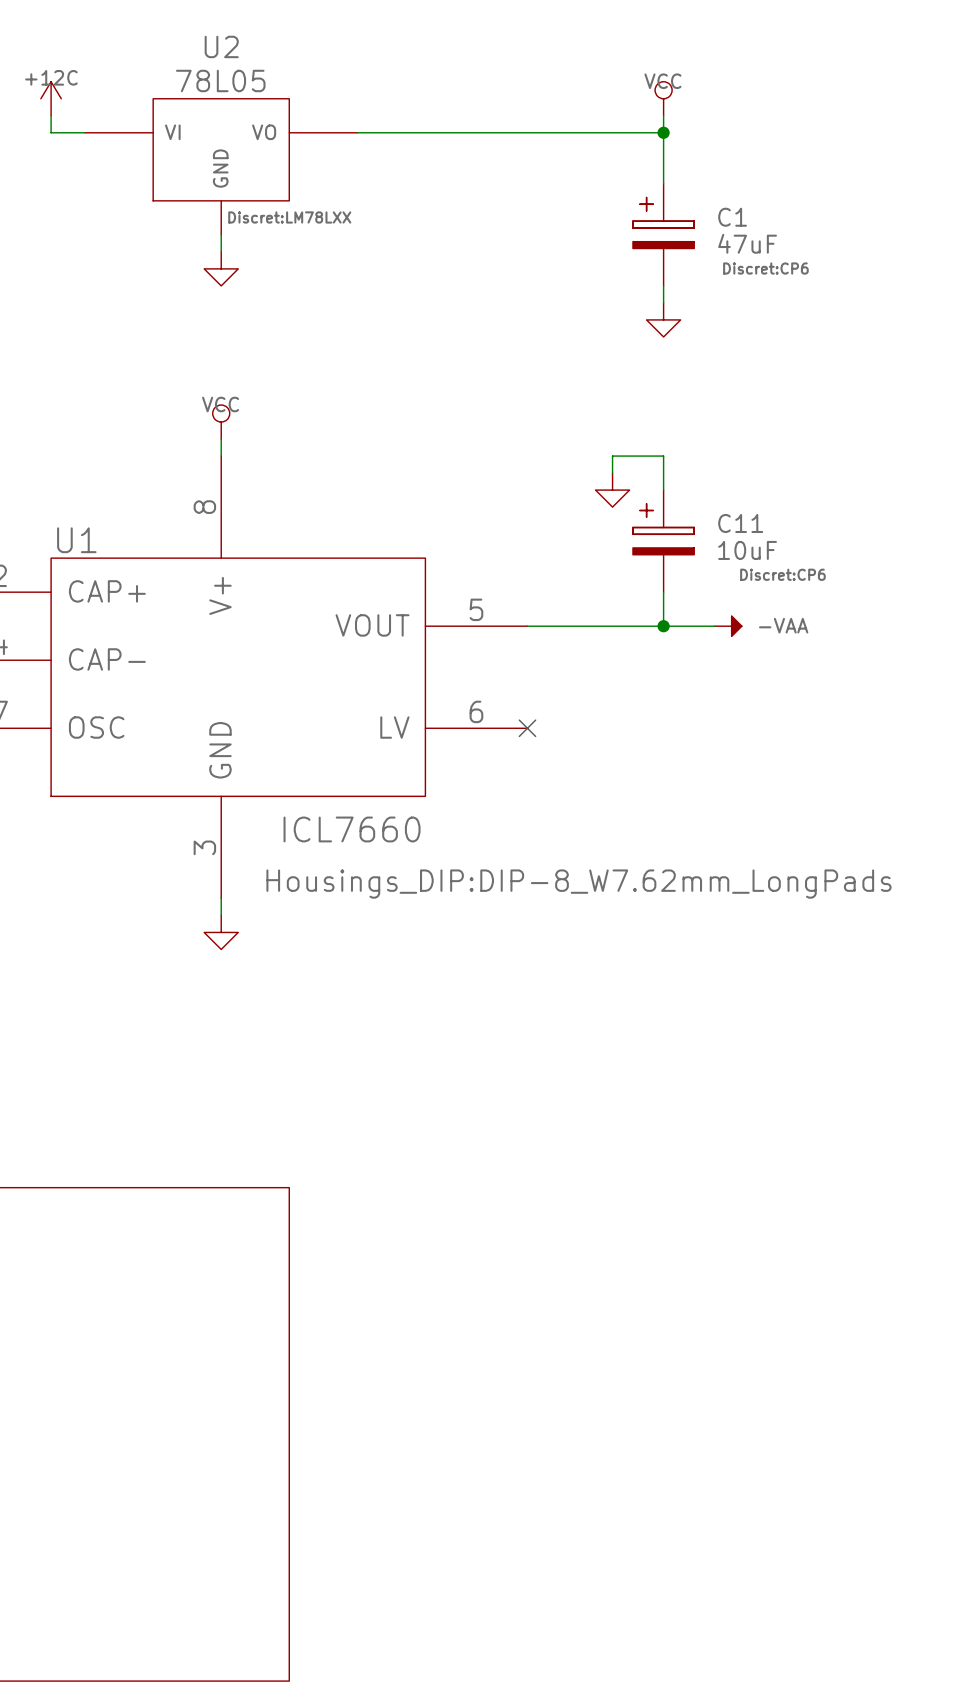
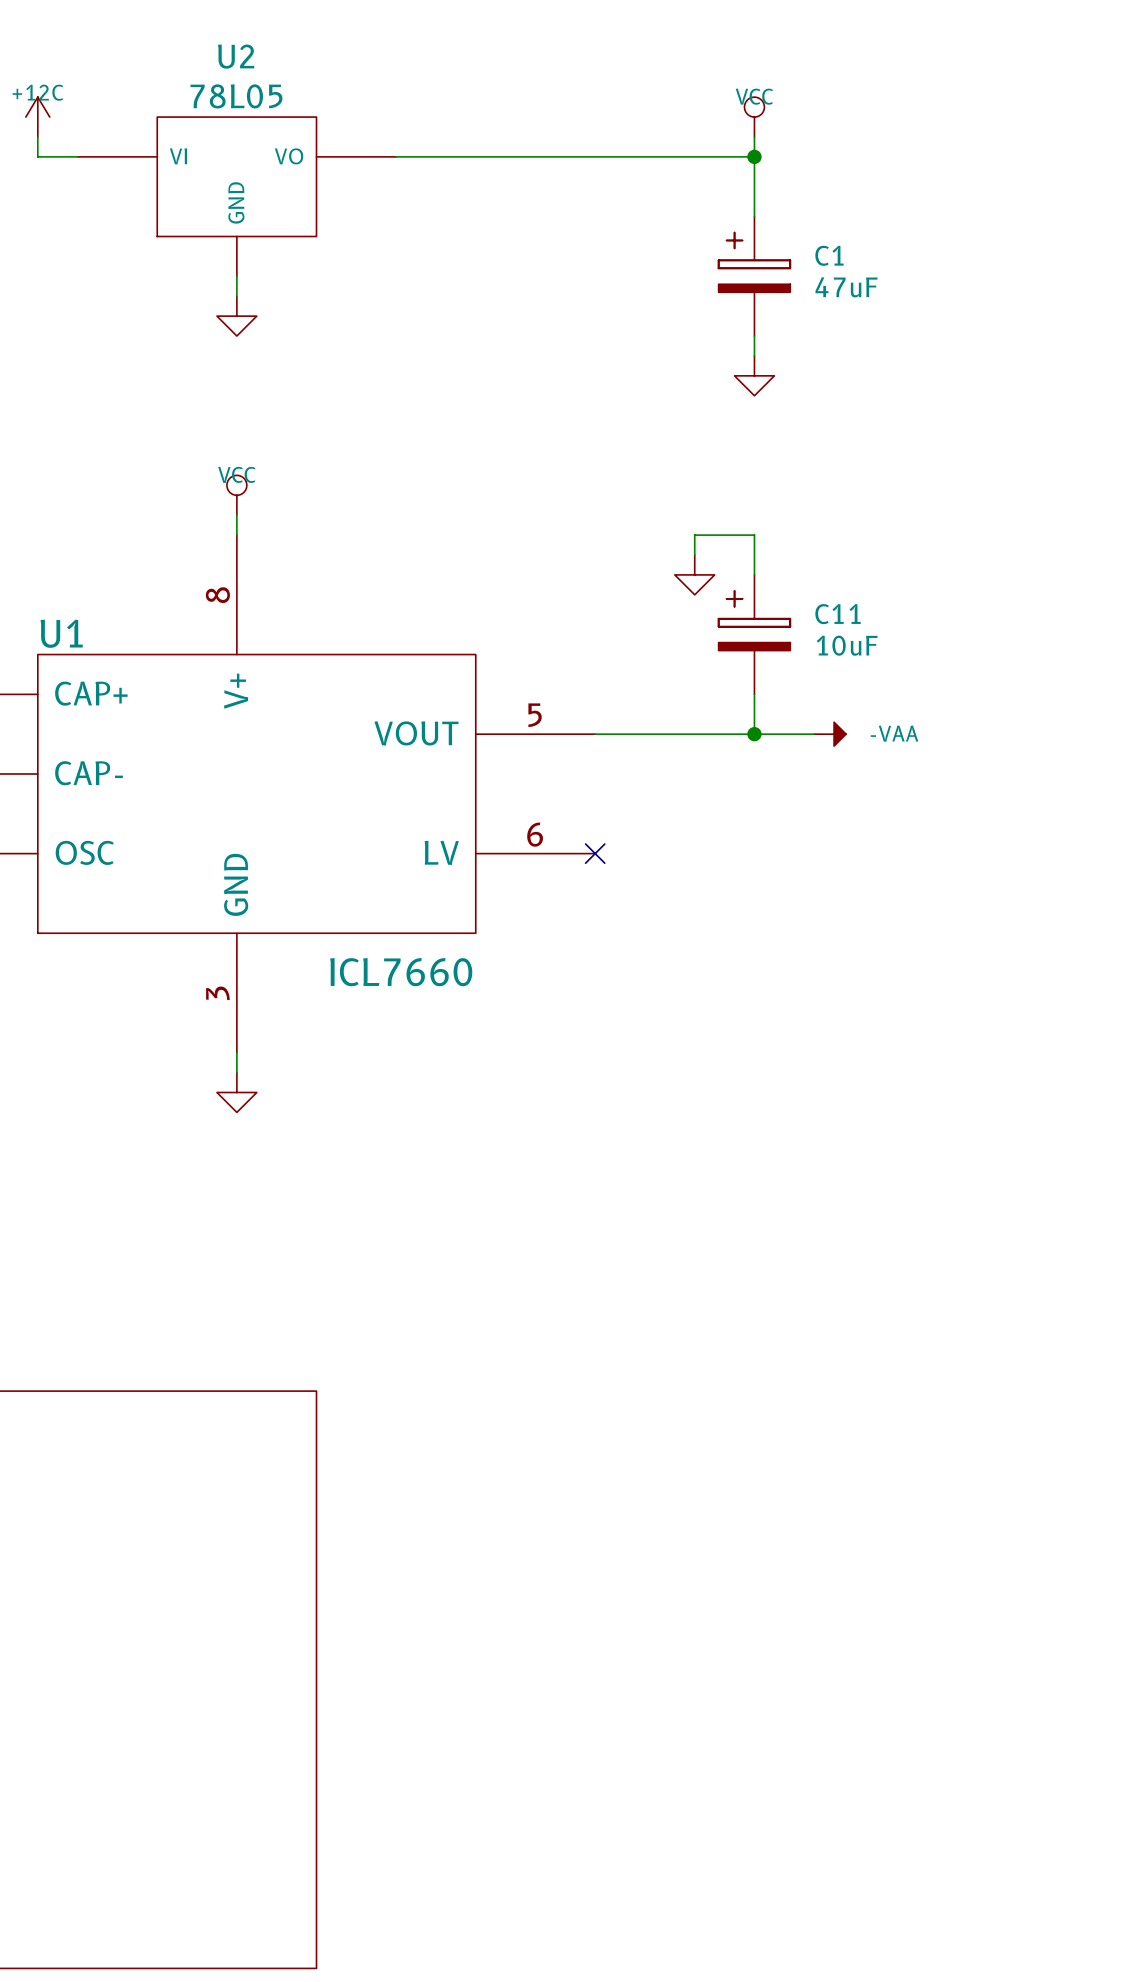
U2 text: Discret:LM78LXX (289, 217) -> none
C1 text: Discret:CP6 (765, 268) -> none
C11 text: Discret:CP6 (782, 574) -> none
U1 text: Housings_DIP:DIP-8_W7.62mm_LongPads (579, 884) -> none

